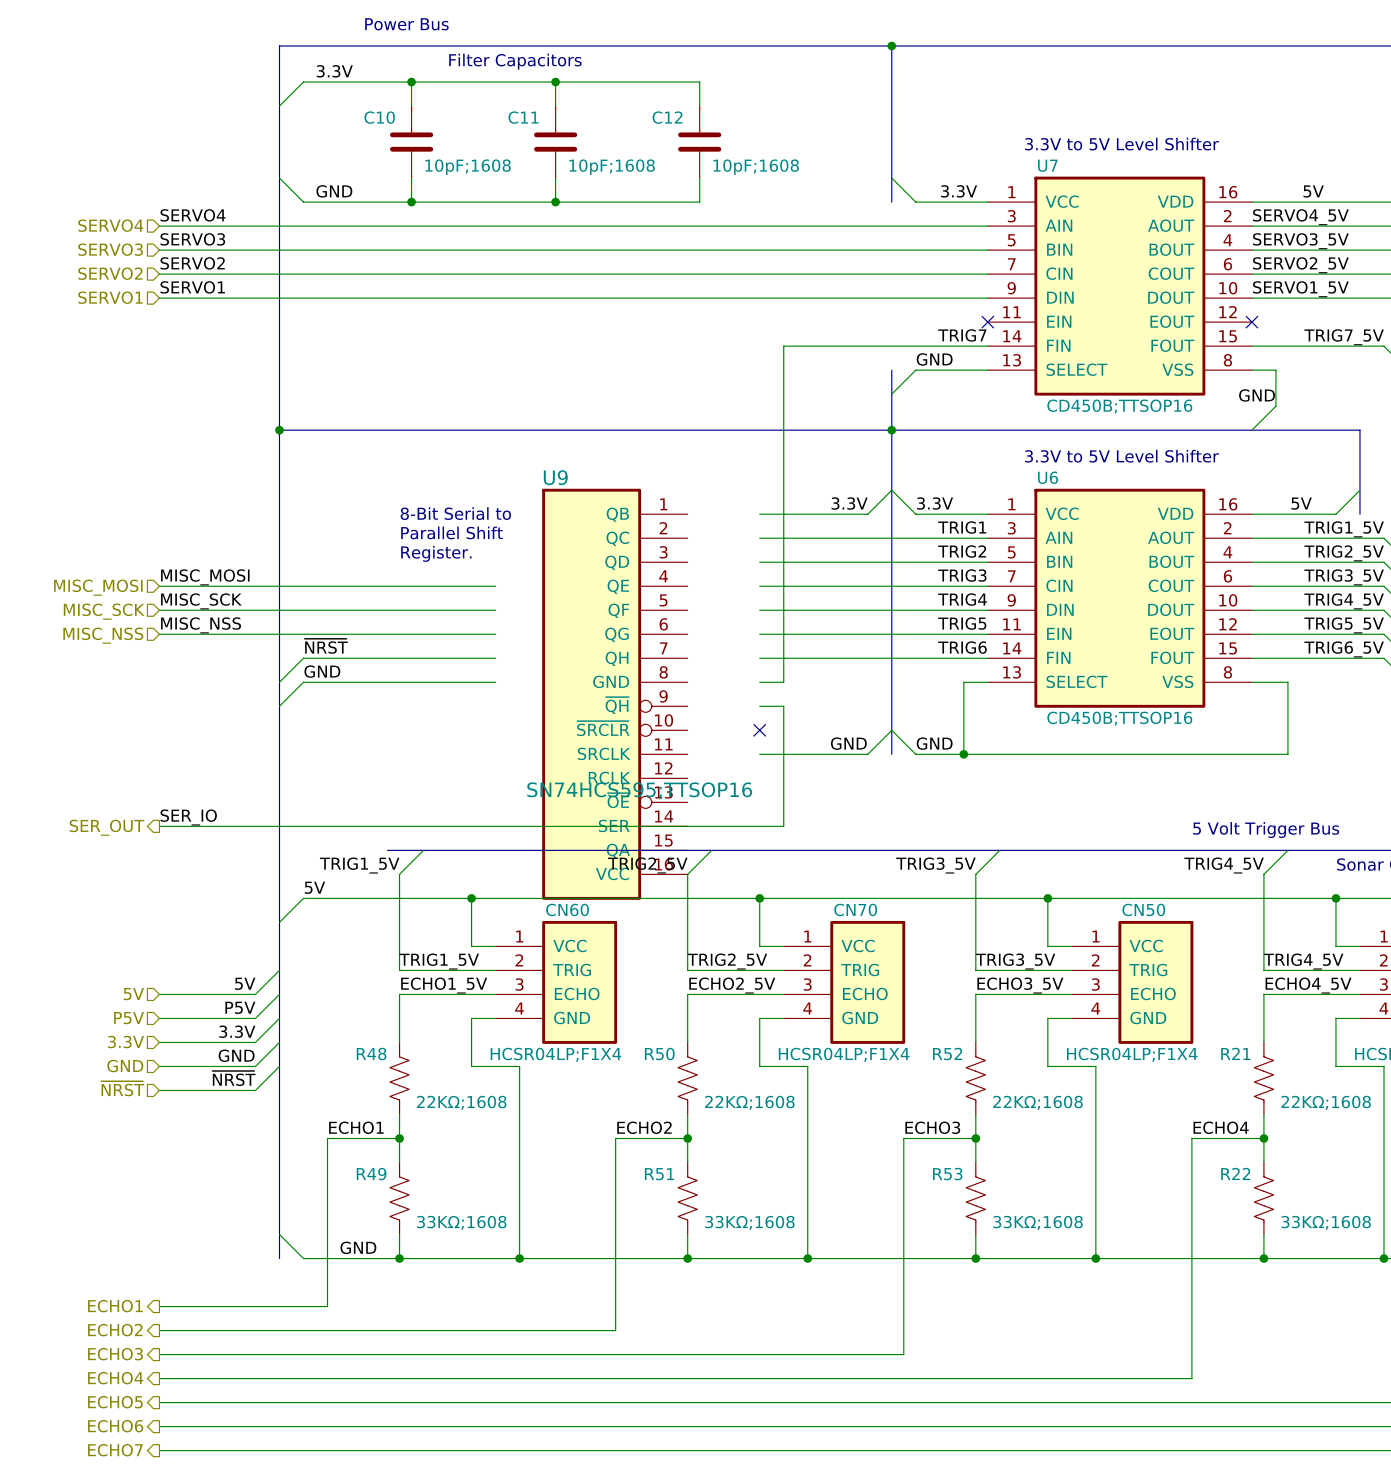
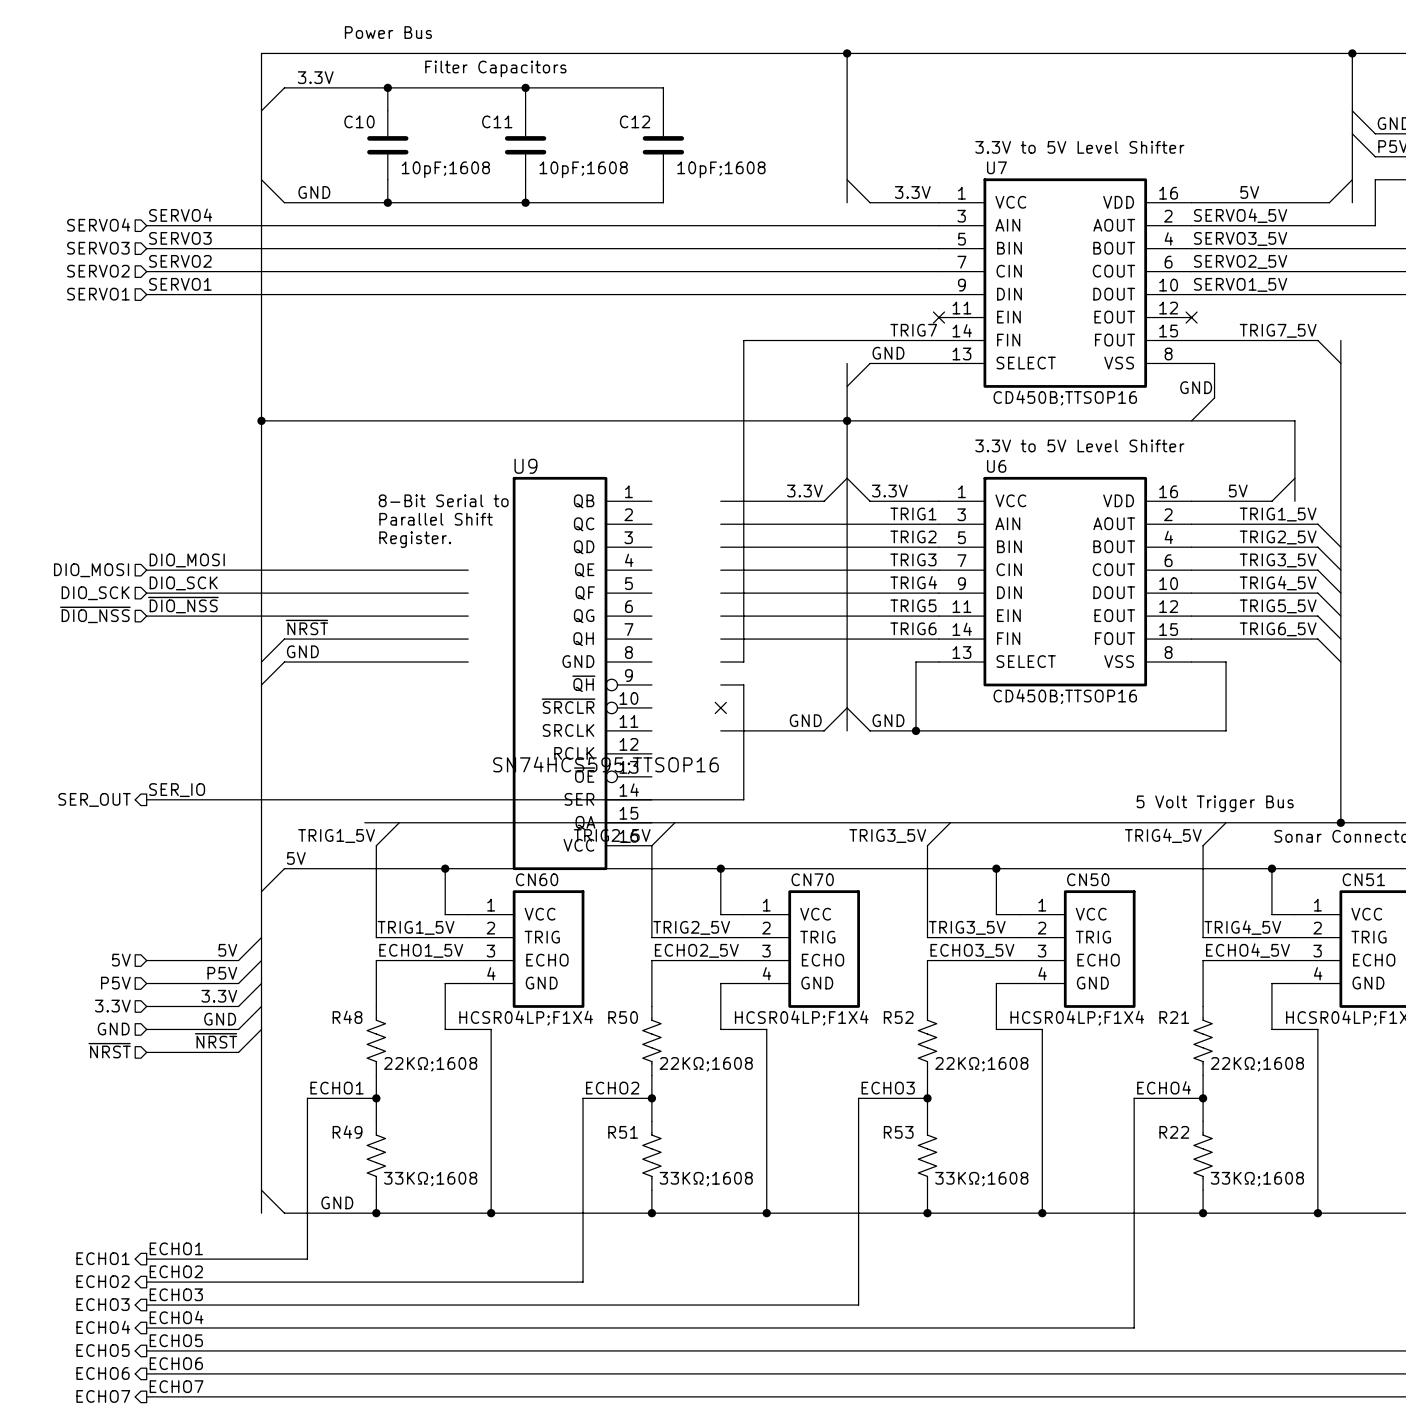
label: MISC_MOSI (205, 577) -> DIO_MOSI (187, 560)
hierarchical label: MISC_MOSI (98, 587) -> DIO_MOSI (91, 570)
label: MISC_SCK (201, 601) -> DIO_SCK (183, 583)
hierarchical label: MISC_SCK (104, 611) -> DIO_SCK (95, 593)
label: MISC_NSS (201, 625) -> ~{DIO_NSS} (183, 605)
hierarchical label: MISC_NSS (103, 635) -> ~{DIO_NSS} (95, 614)
label: none -> ECHO1 (176, 1248)
label: none -> ECHO2 (176, 1271)
label: none -> ECHO3 (176, 1294)
label: none -> ECHO4 (176, 1317)
label: none -> ECHO5 (176, 1340)
label: none -> ECHO6 (176, 1363)
label: none -> ECHO7 (176, 1386)

